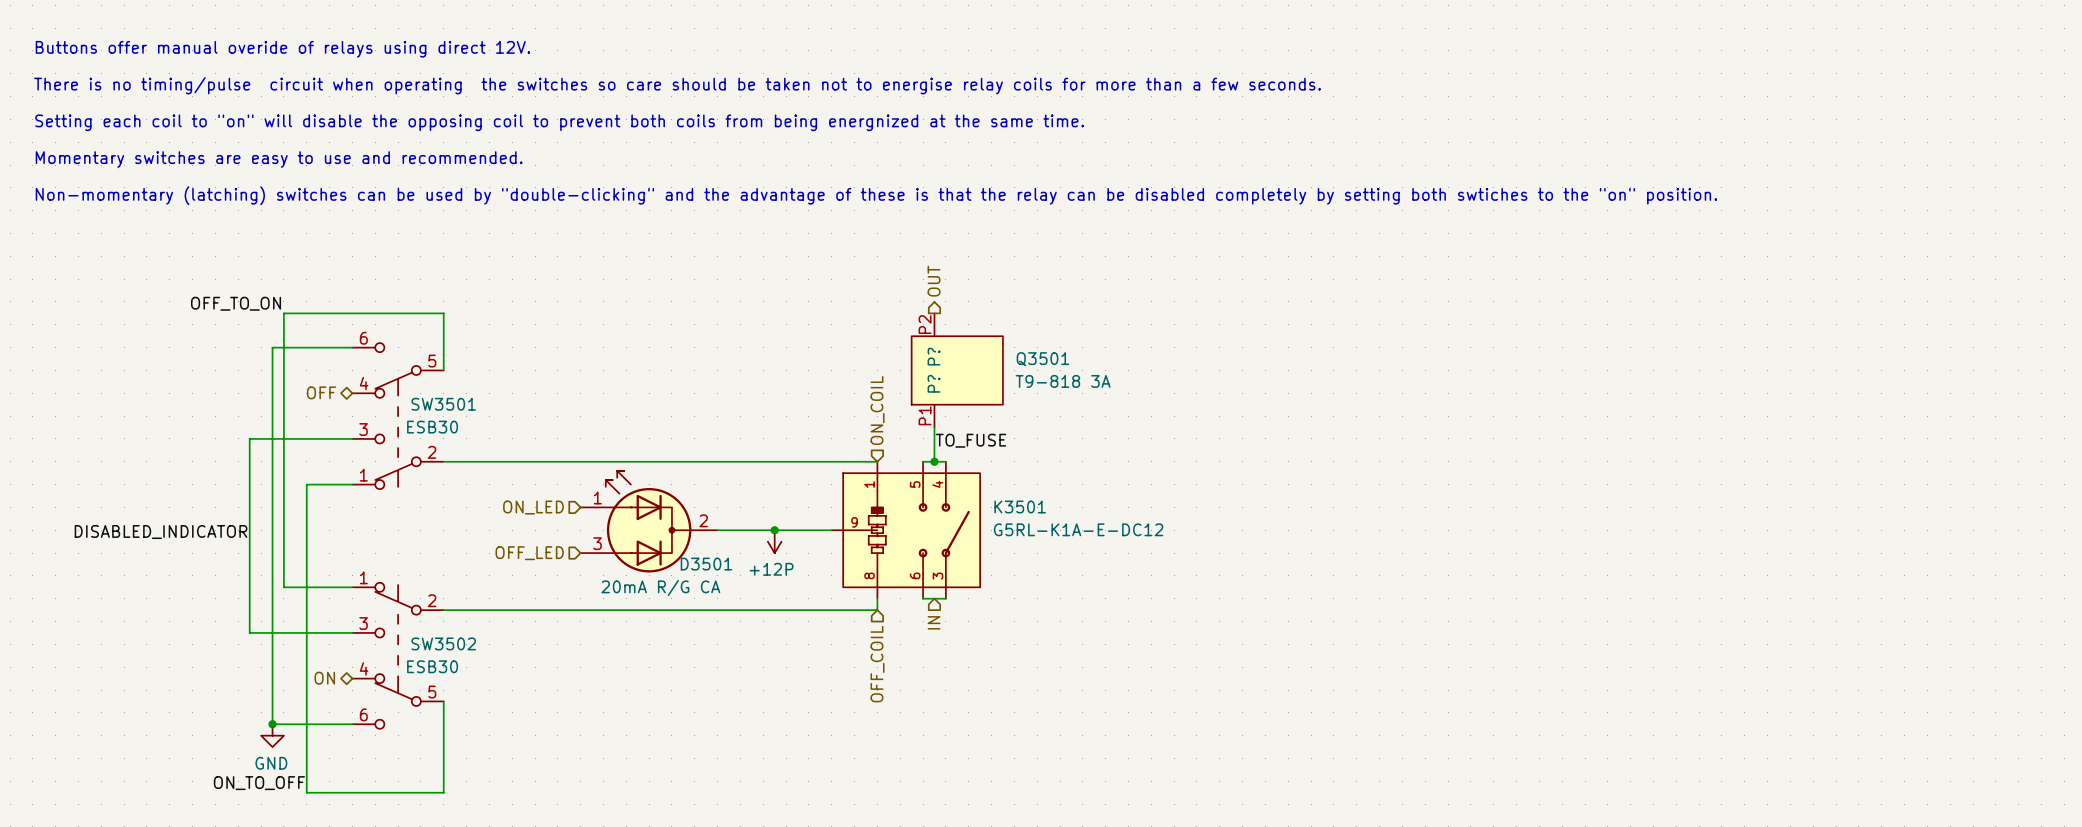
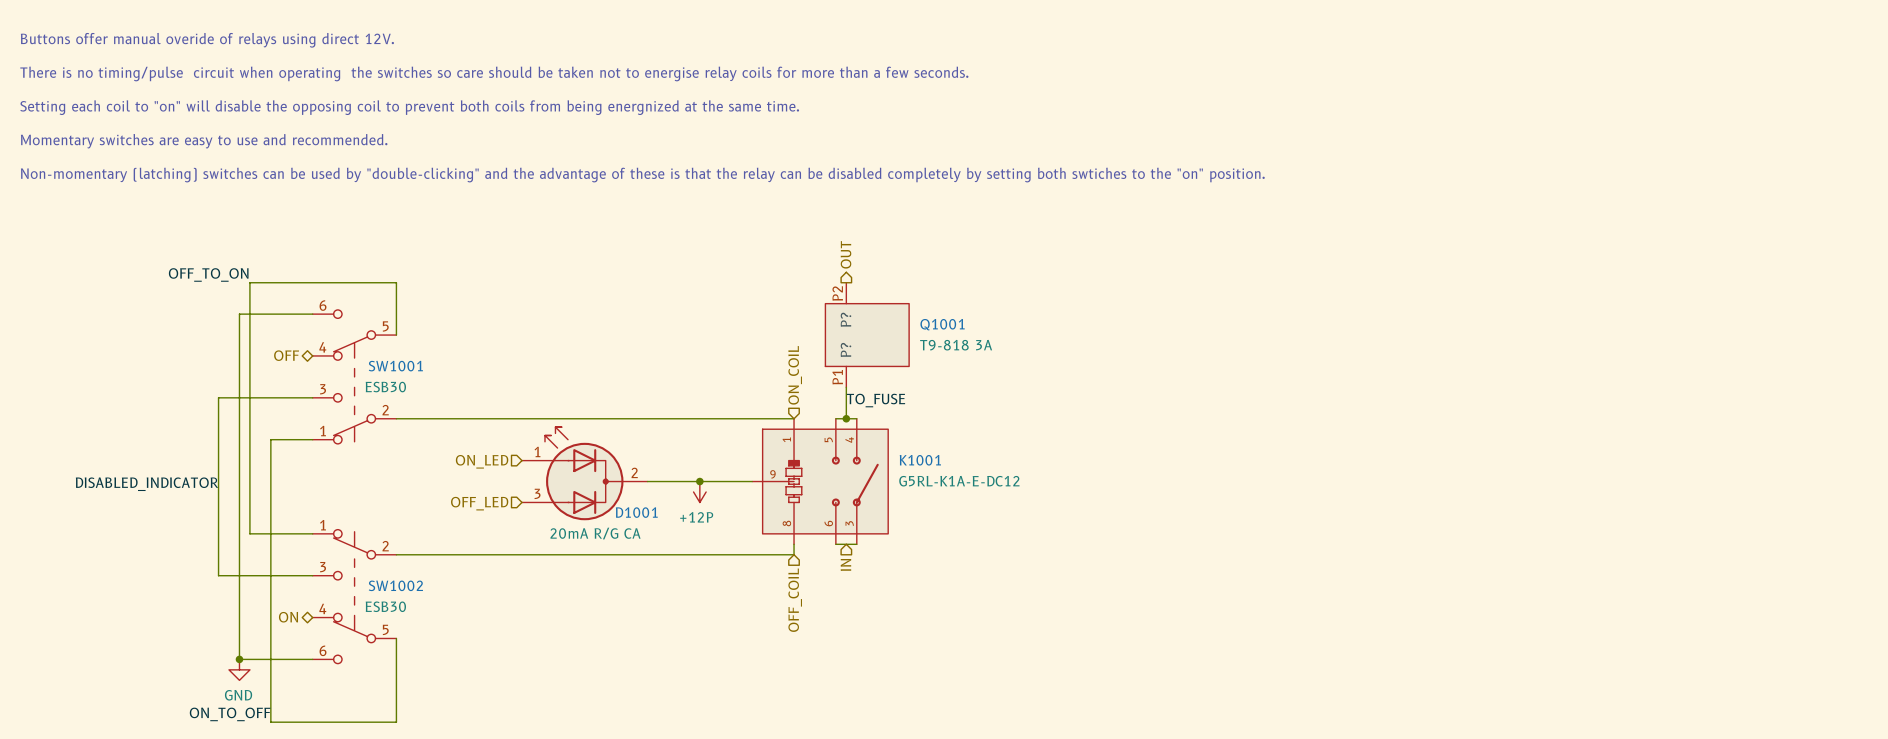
Q3501 name: Q3501 (1042, 359) -> Q1001 (942, 324)
SW3501 name: SW3501 (443, 404) -> SW1001 (395, 366)
K3501 name: K3501 (1020, 506) -> K1001 (920, 460)
D3501 name: D3501 (706, 564) -> D1001 (636, 512)
SW3502 name: SW3502 (443, 643) -> SW1002 (395, 585)

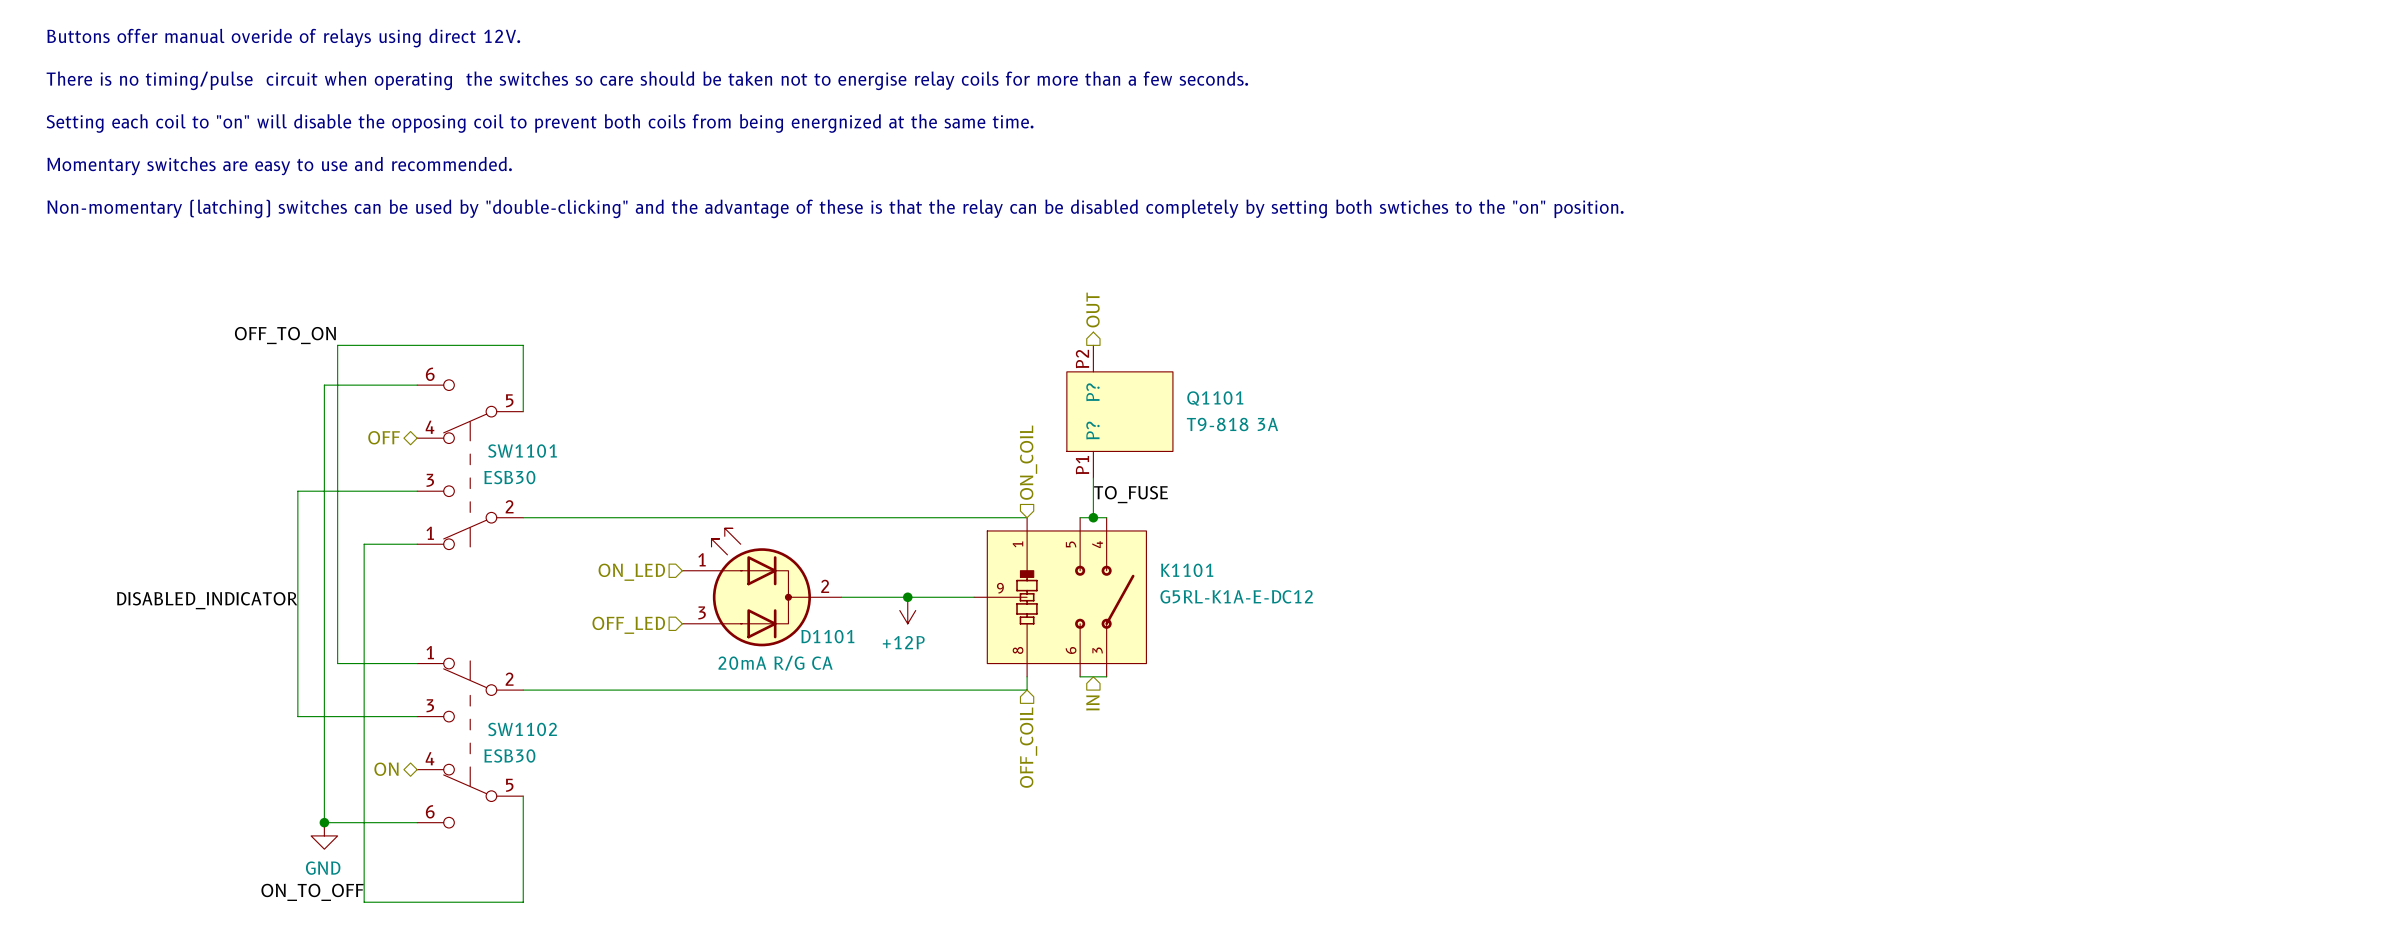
Q1001 name: Q1001 (942, 324) -> Q1101 (1215, 398)
SW1001 name: SW1001 (395, 366) -> SW1101 (522, 451)
K1001 name: K1001 (920, 460) -> K1101 (1187, 570)
D1001 name: D1001 (636, 512) -> D1101 (827, 636)
SW1002 name: SW1002 (395, 585) -> SW1102 (522, 729)

